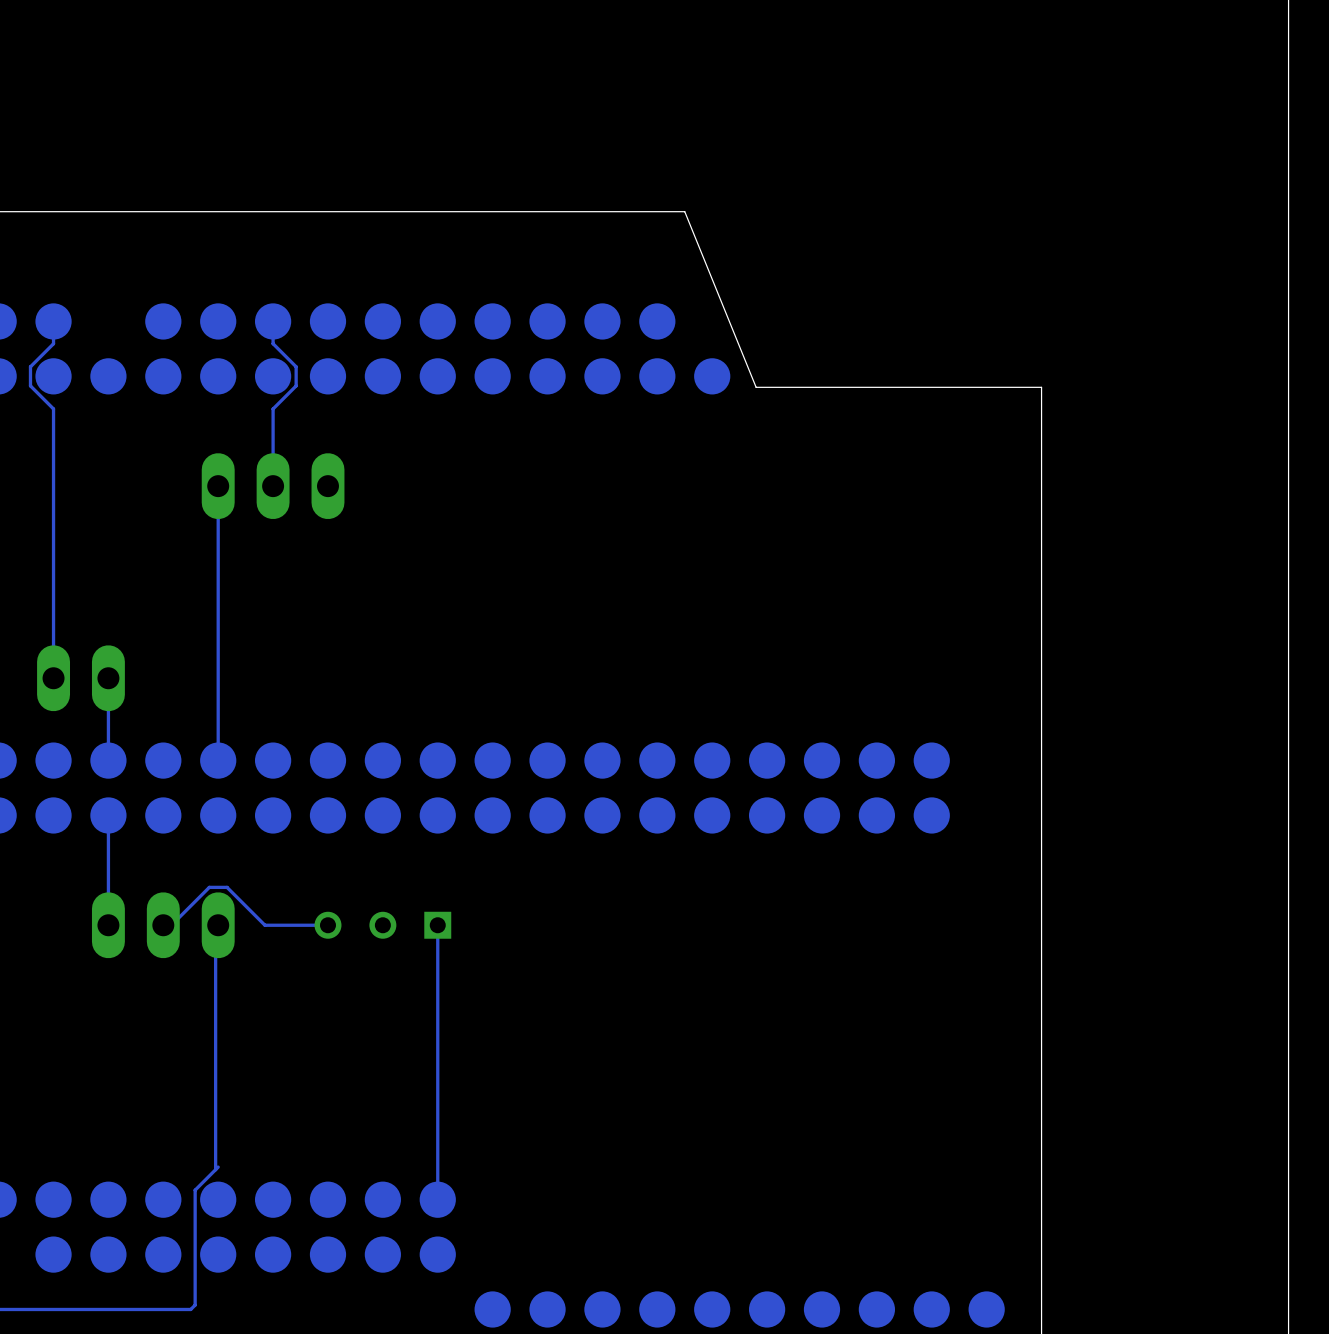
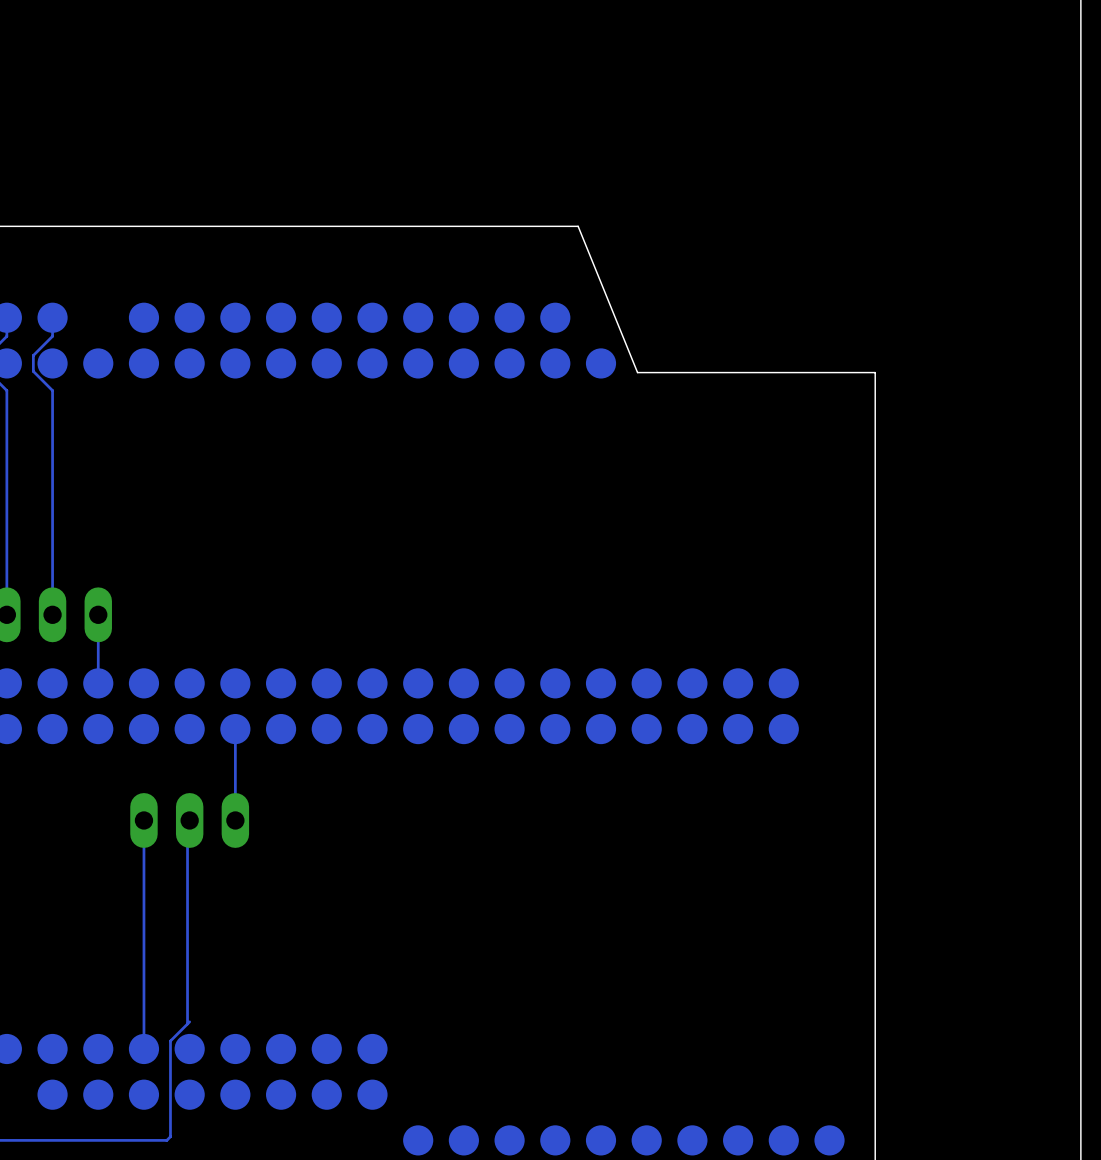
bottom track: (273, 321) (273, 343) (296, 366) (296, 385) (273, 408) (273, 486) -> none
bottom track: (218, 486) (218, 760) -> none
part: (273, 486) -> none
bottom track: (108, 815) (108, 925) -> (235, 729) (235, 820)
part position: (163, 925) -> (189, 820)
bottom track: (327, 925) (264, 925) (227, 887) (209, 887) (171, 925) (163, 925) -> (143, 1048) (143, 820)
part: (382, 925) -> none
bottom track: (437, 925) (437, 1199) -> none

